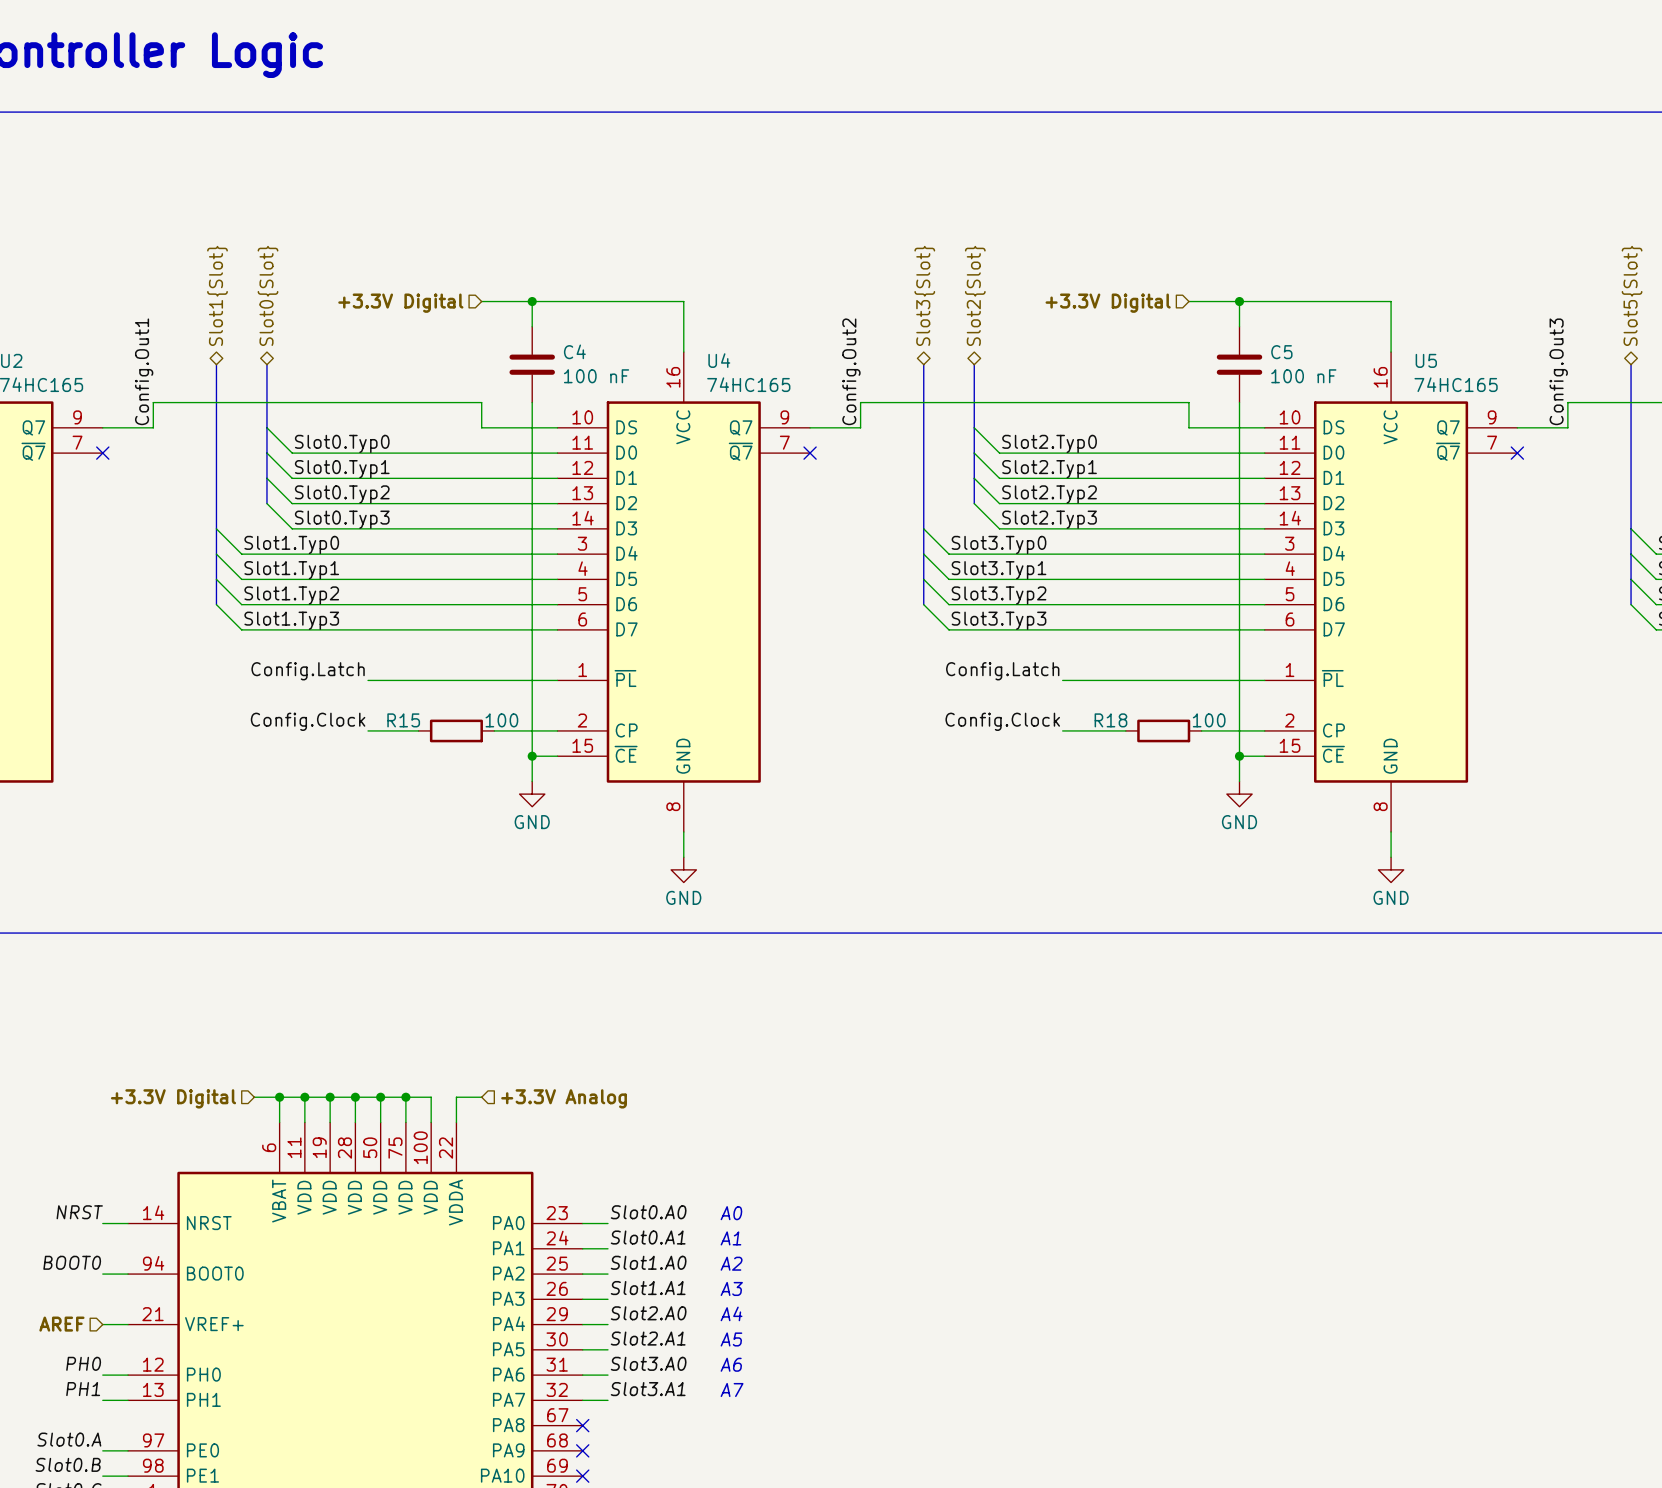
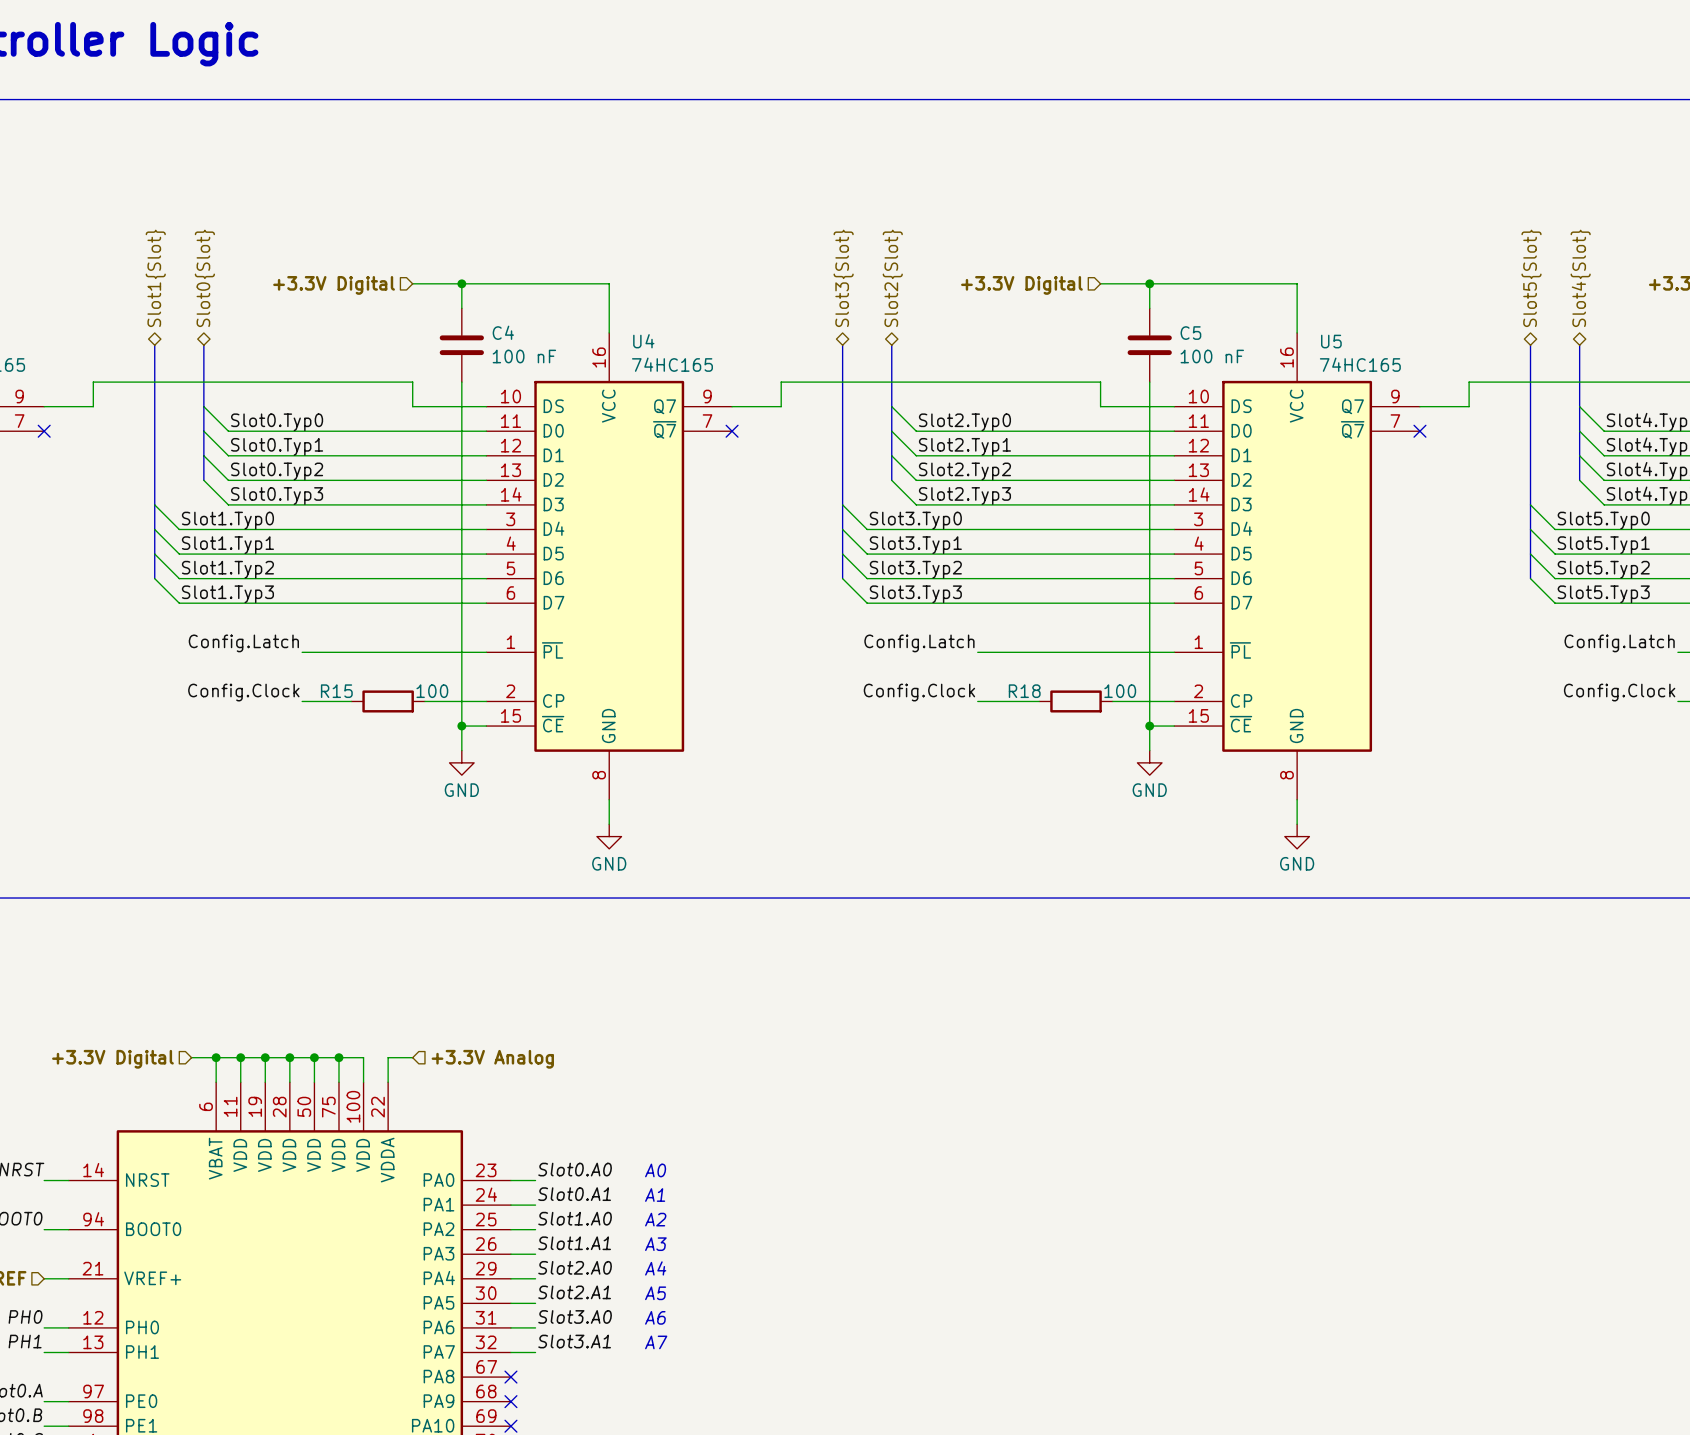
label: Config.Out1 (144, 371) -> none
label: Config.Out2 (851, 371) -> none
label: Config.Out3 (1558, 371) -> none

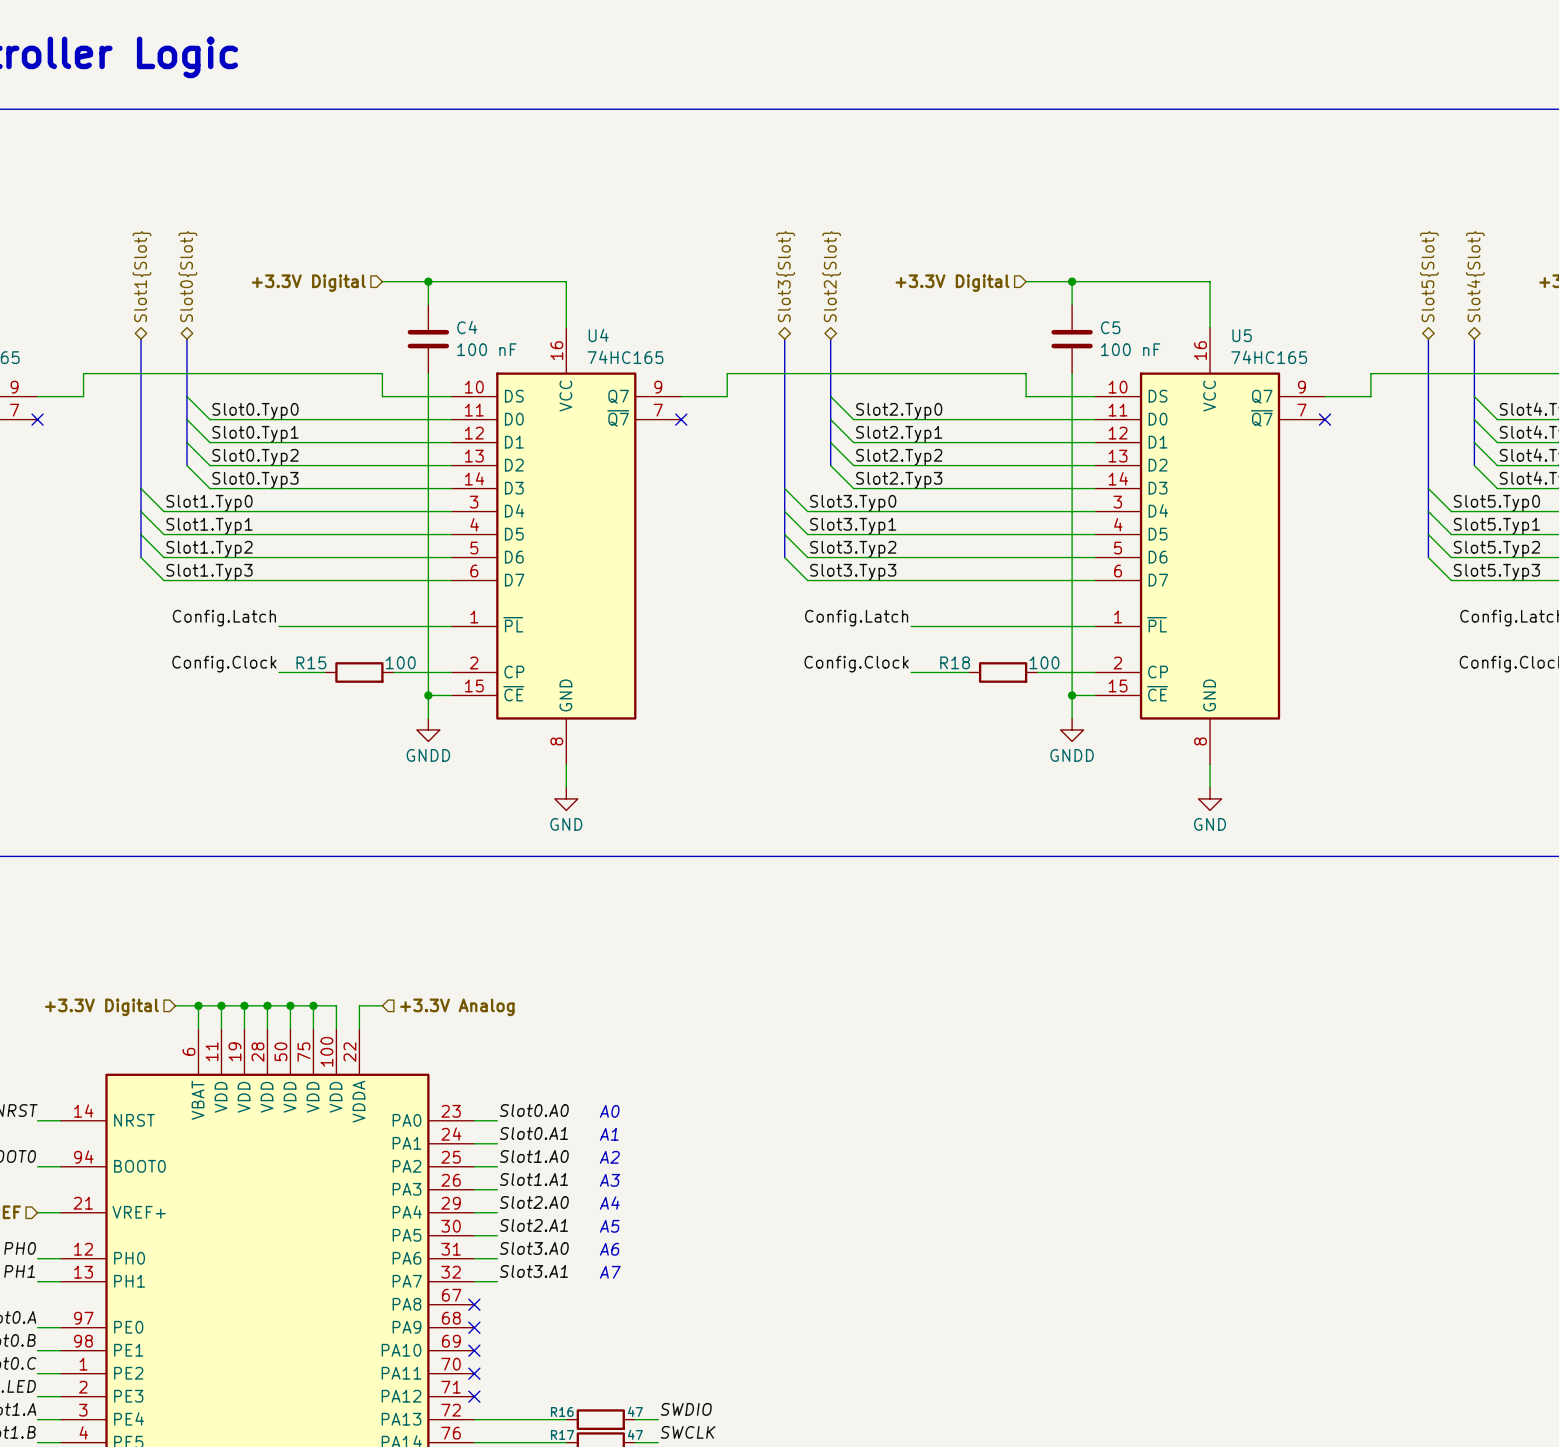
power symbol: GND (461, 762) -> GNDD (428, 729)
power symbol: GND (1149, 762) -> GNDD (1072, 729)

